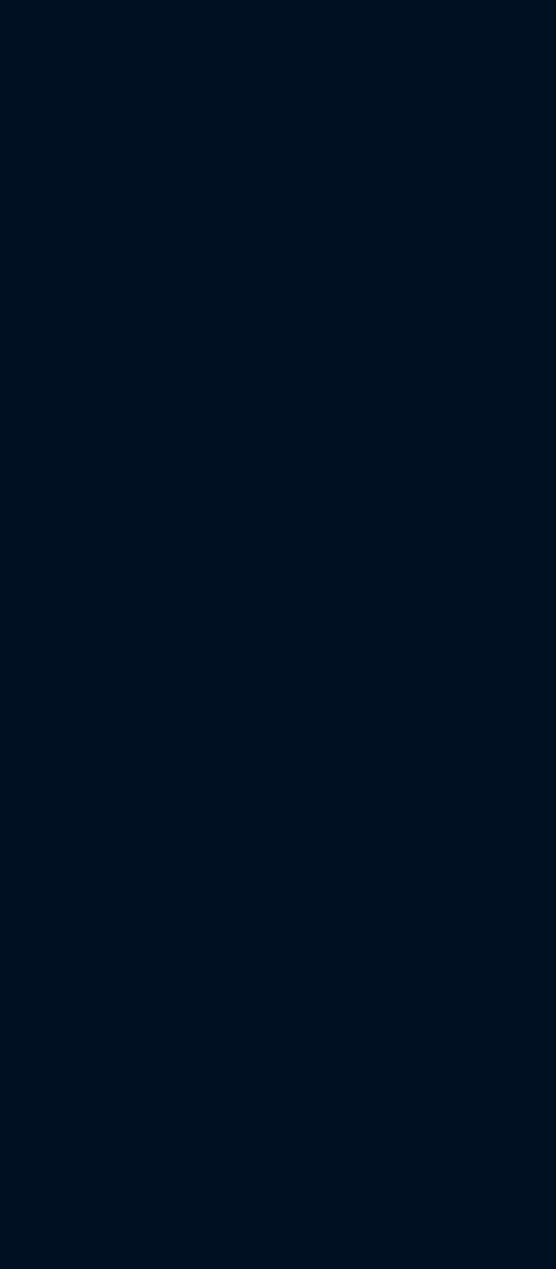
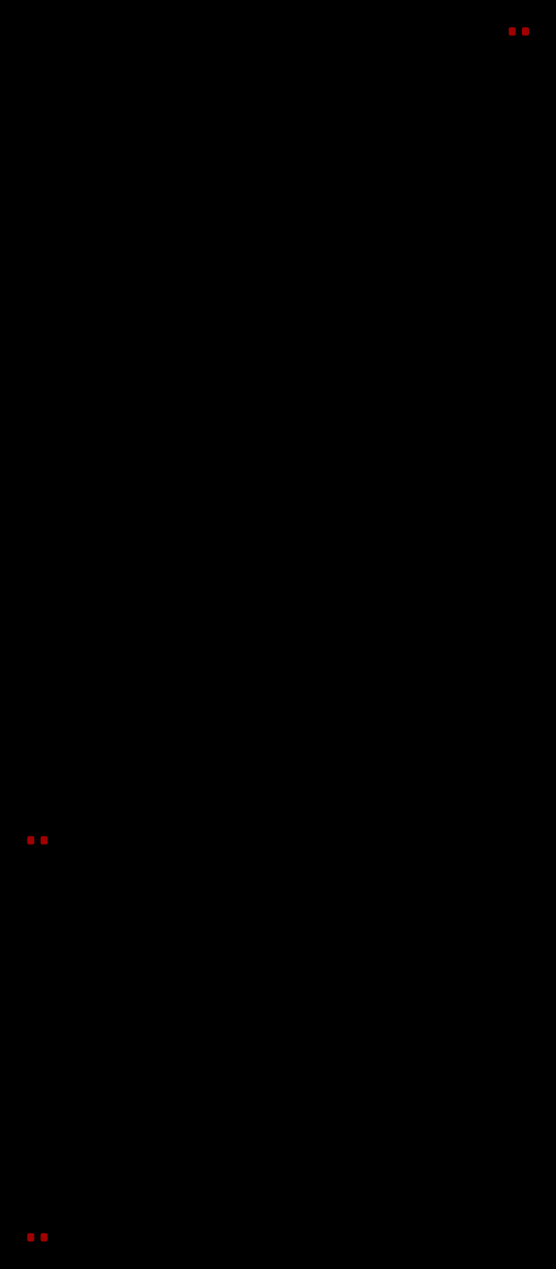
part: none -> (518, 31)
part: none -> (37, 840)
part: none -> (37, 1237)

